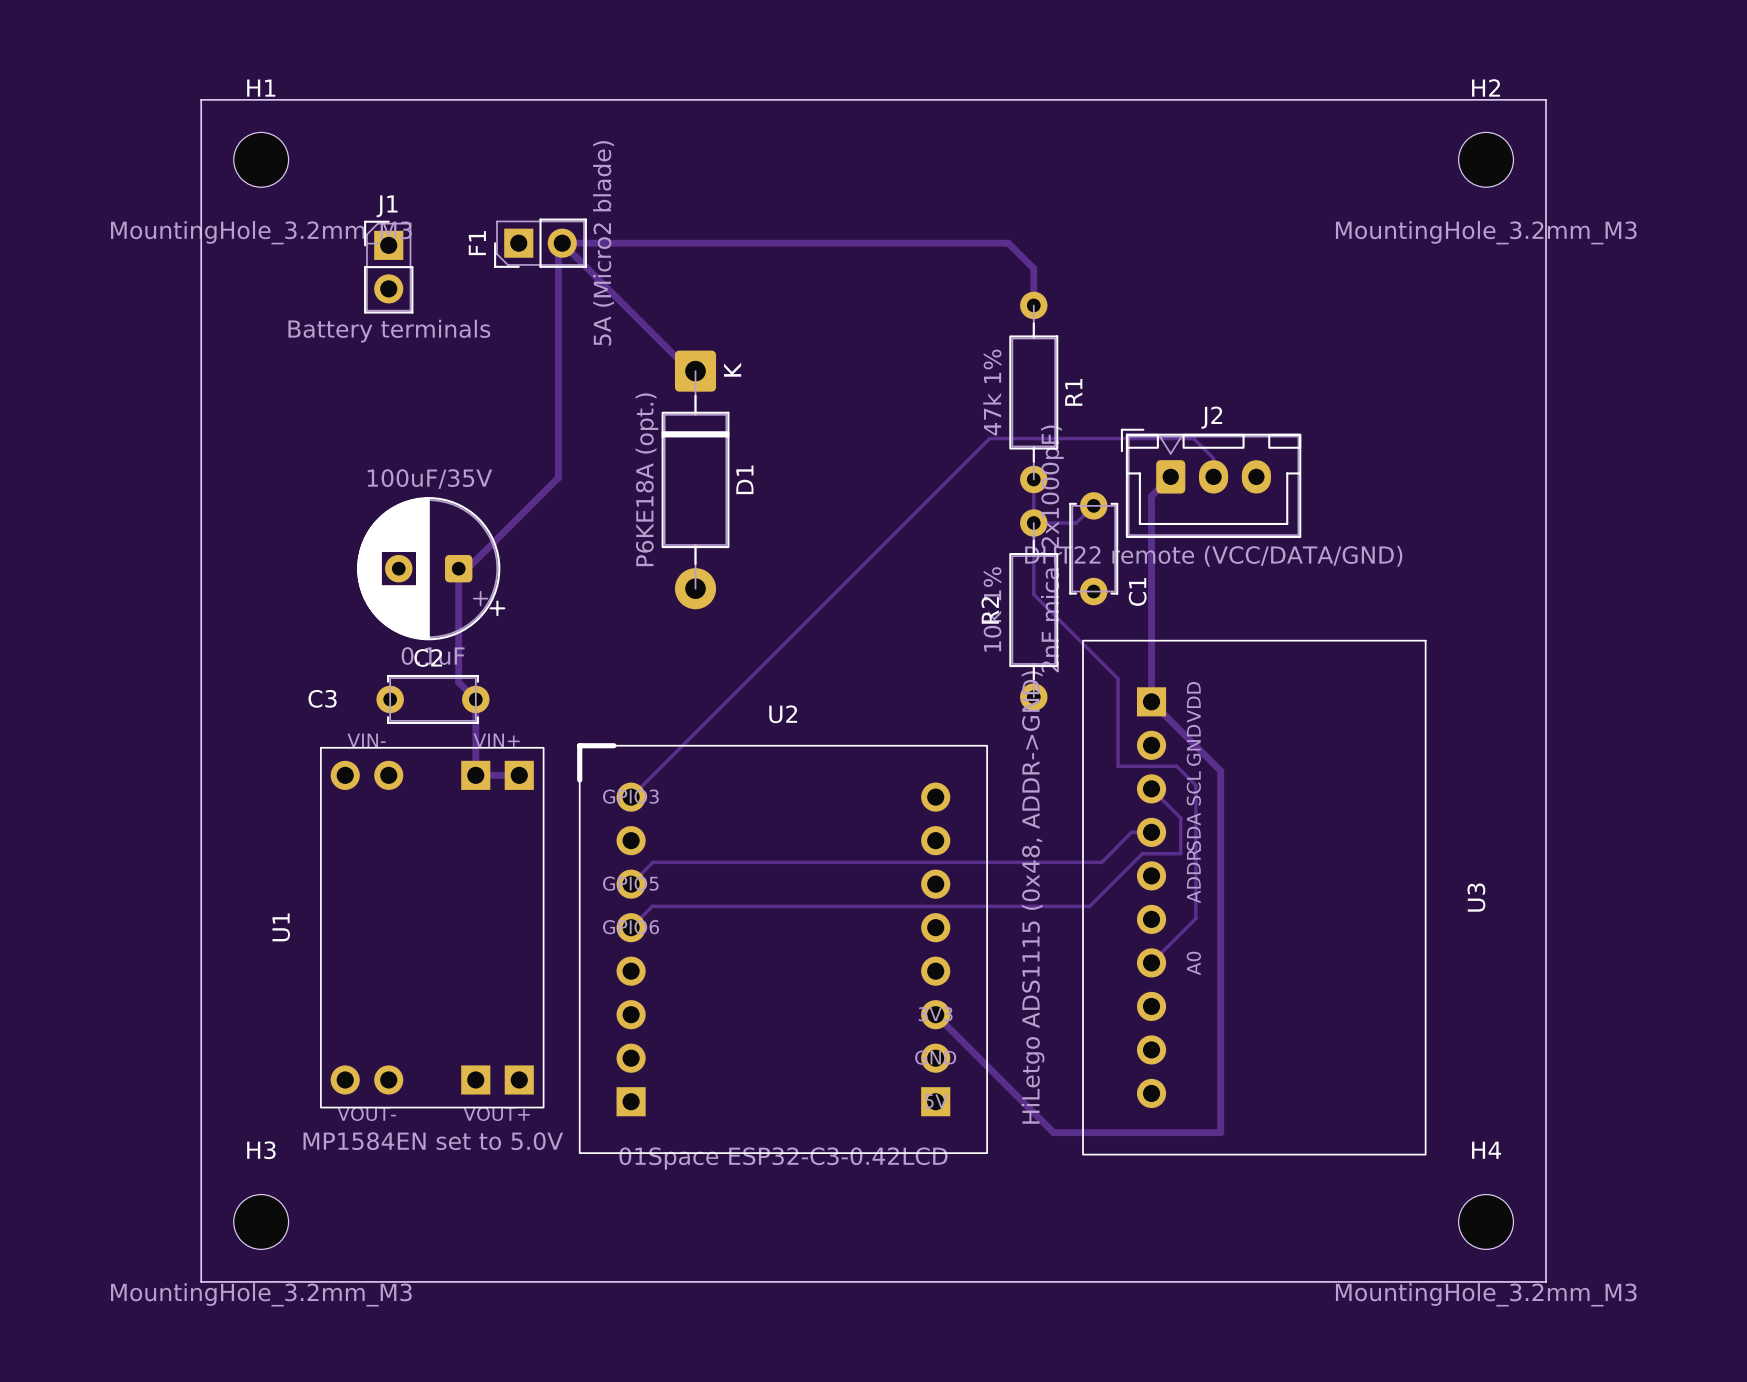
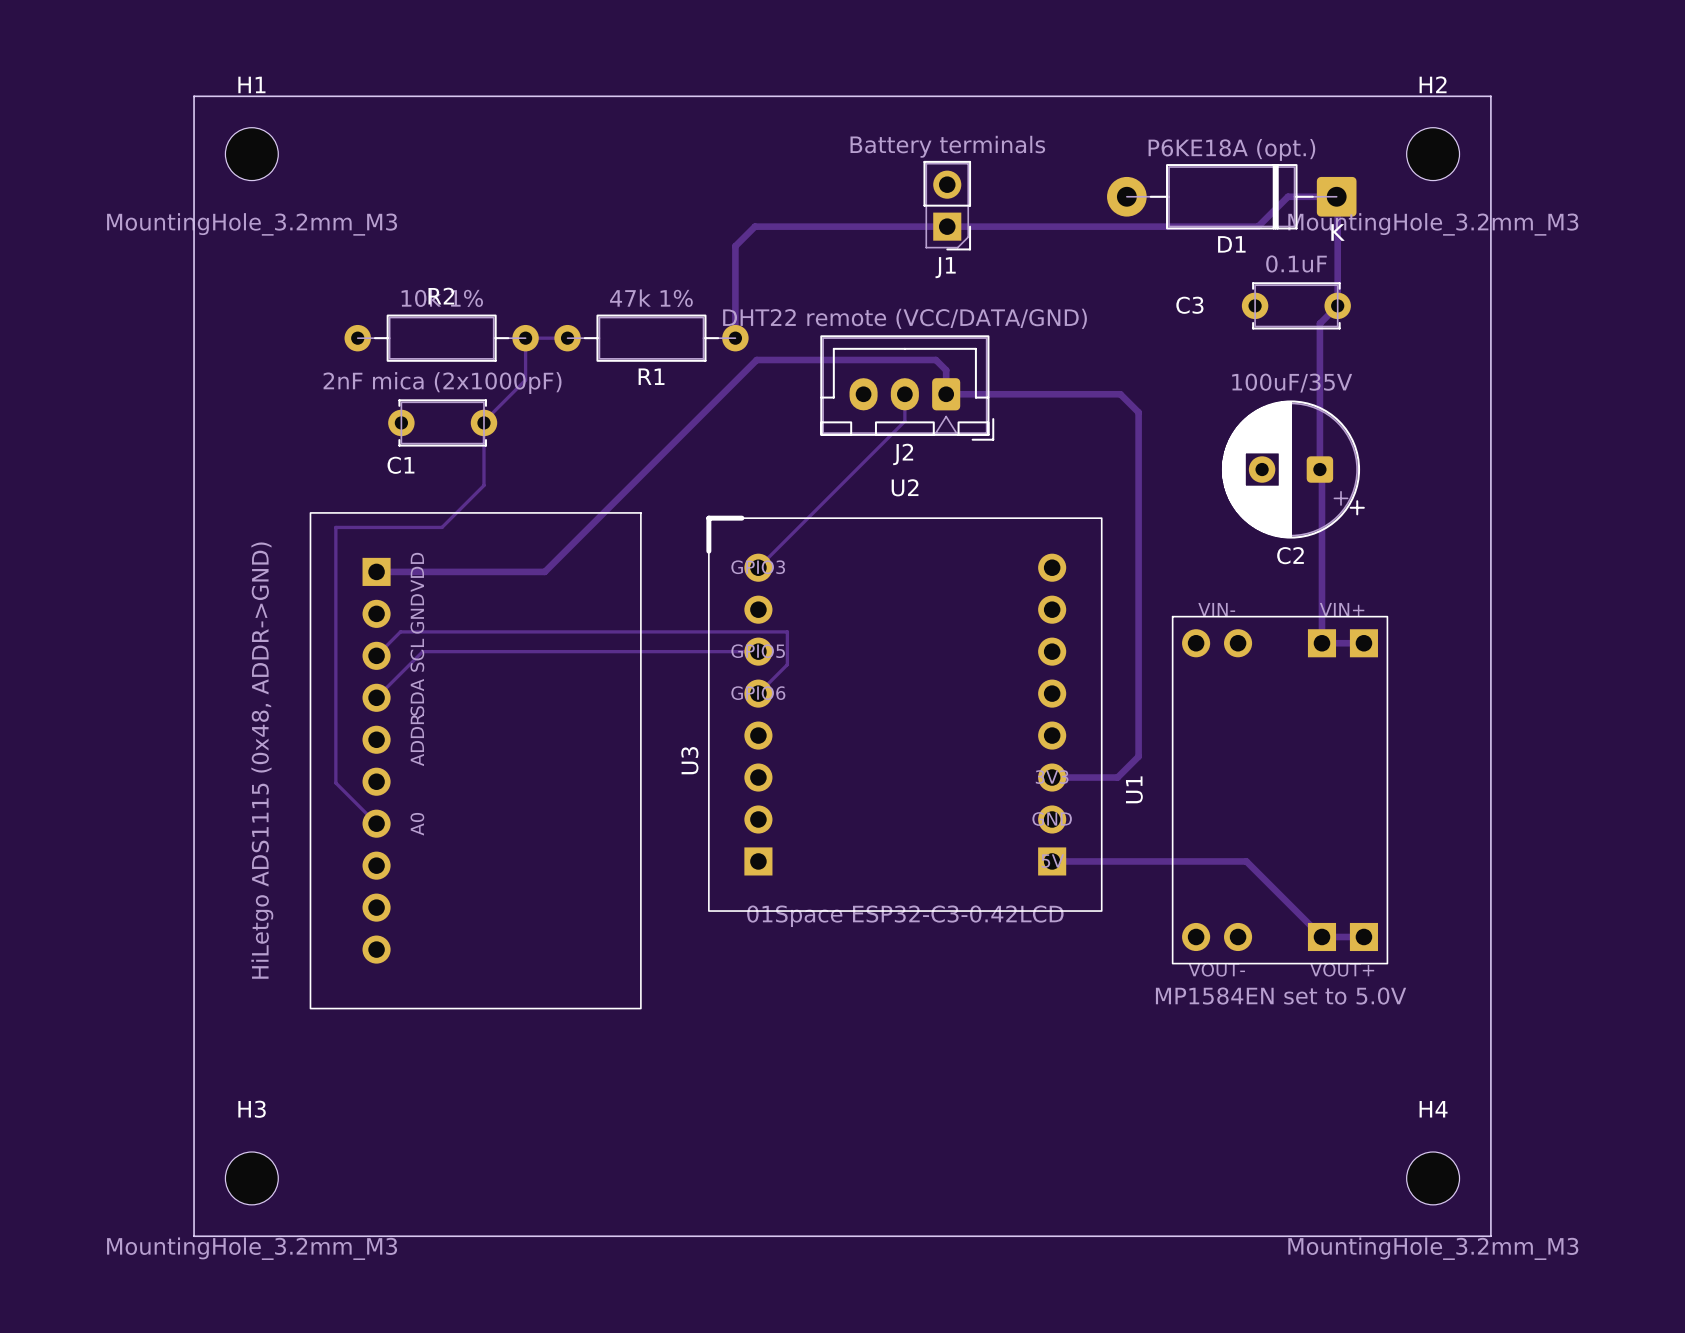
track: none -> (1336, 196) (1287, 196) (1258, 226) (754, 226) (735, 246) (735, 338)
track: none -> (1337, 197) (1337, 305) (1319, 323) (1319, 469)
F1: 5A (Micro2 blade) (540, 243) -> none
track: (562, 243) (690, 371) (695, 371) -> none
J1 rotation: 0° (388, 267) -> 180° (947, 205)
J1 position: (388, 267) -> (947, 205)
track: (1033, 305) (1033, 268) (1008, 243) (560, 243) (558, 245) (558, 477) (467, 568) (458, 568) -> none
track: none -> (567, 338) (525, 338) (525, 380) (483, 421)
R1 rotation: 0° (1033, 392) -> 90° clockwise (651, 338)
R1 position: (1033, 392) -> (651, 338)
track: none -> (904, 394) (904, 421) (758, 567)
track: none -> (483, 422) (483, 485) (442, 527) (335, 527) (335, 782) (376, 823)
track: (1170, 476) (1151, 496) (1151, 701) (1220, 771) (1220, 1132) (1053, 1132) (935, 1014) -> none
track: (1213, 476) (1213, 458) (1193, 438) (989, 438) (631, 797) -> none
D1 rotation: 0° (695, 479) -> 90° clockwise (1231, 196)
D1 position: (695, 479) -> (1231, 196)
track: (1033, 479) (1033, 594) (1118, 678) (1118, 766) (1176, 766) (1195, 785) (1195, 918) (1151, 962) -> none
J2 rotation: 0° (1211, 483) -> 180° (907, 387)
J2 position: (1211, 483) -> (907, 387)
track: none -> (1321, 471) (1321, 643) (1363, 643)
track: (1093, 505) (1076, 523) (1033, 523) -> none
C1 rotation: 0° (1093, 548) -> 90° clockwise (442, 422)
C1 position: (1093, 548) -> (442, 422)
track: (458, 567) (458, 682) (475, 699) (475, 775) (519, 775) -> none
C2 position: (431, 568) -> (1293, 469)
track: none -> (376, 571) (544, 571) (756, 360) (935, 360) (946, 370) (946, 394) (1120, 394) (1138, 412) (1138, 756) (1117, 777) (1052, 777)
R2 rotation: 0° (1033, 610) -> 90° clockwise (441, 338)
R2 position: (1033, 610) -> (441, 338)
track: none -> (758, 651) (422, 651) (376, 697)
track: none -> (376, 655) (400, 631) (787, 631) (787, 664) (758, 693)
C3 position: (432, 699) -> (1296, 305)
track: (1151, 788) (1180, 818) (1180, 853) (1142, 853) (1089, 906) (652, 906) (631, 927) -> none
track: (1151, 832) (1131, 832) (1117, 846) -> none
track: (1117, 846) (1101, 862) (652, 862) (631, 884) -> none
track: none -> (1052, 861) (1246, 861) (1321, 936) (1363, 936)
U3 position: (1254, 897) -> (475, 760)
U1 position: (432, 927) -> (1280, 790)
U2 position: (782, 948) -> (904, 713)

